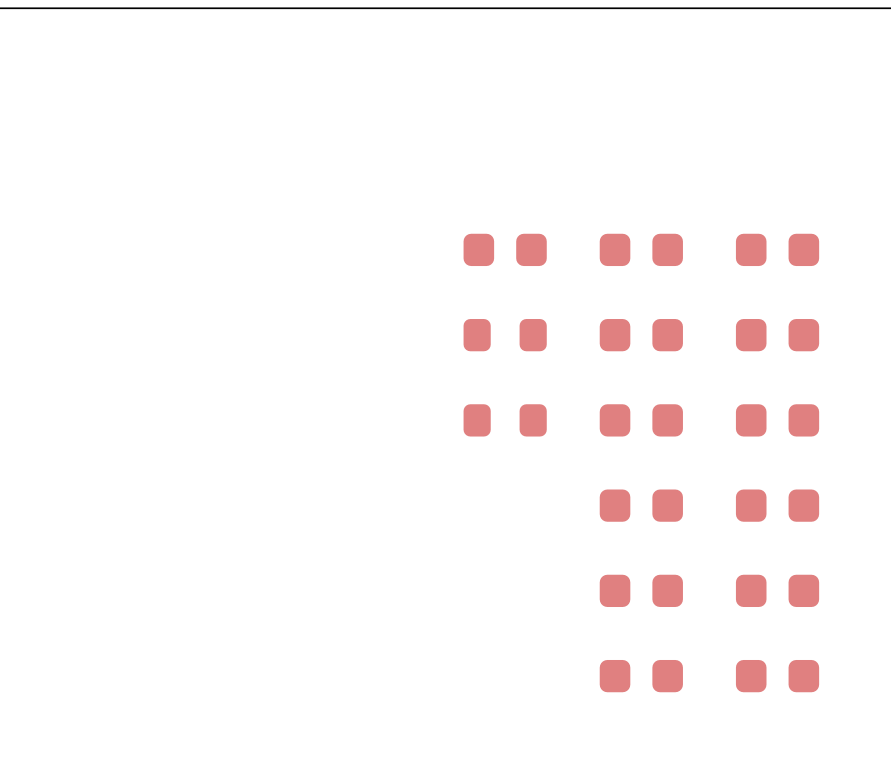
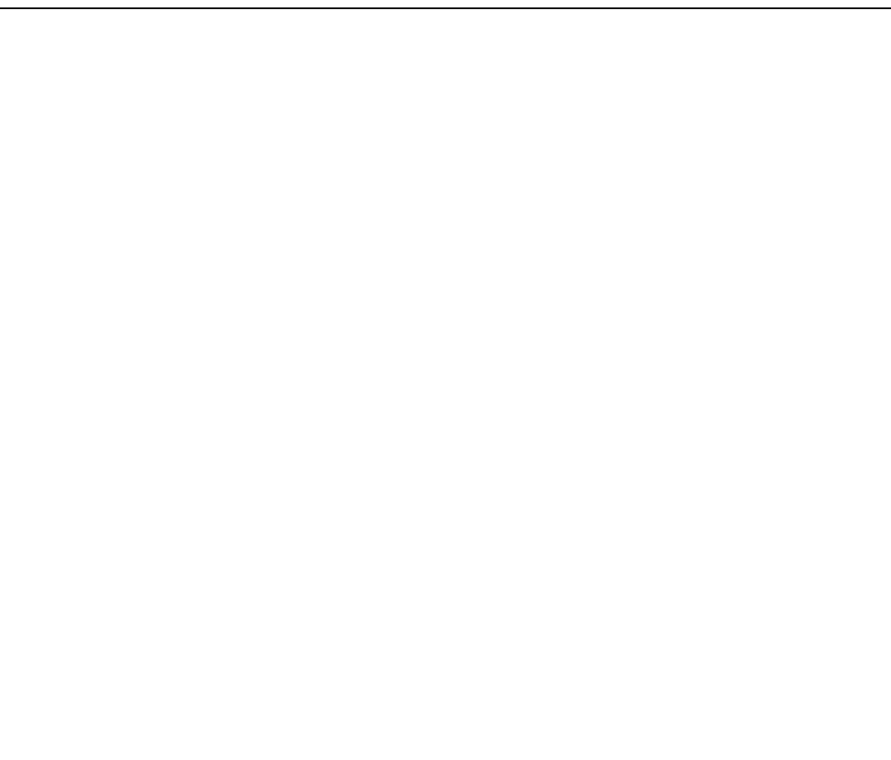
part: (505, 249) -> none
part: (641, 249) -> none
part: (777, 249) -> none
part: (505, 335) -> none
part: (641, 335) -> none
part: (777, 335) -> none
part: (505, 420) -> none
part: (641, 420) -> none
part: (777, 420) -> none
part: (641, 505) -> none
part: (777, 505) -> none
part: (641, 590) -> none
part: (777, 590) -> none
part: (641, 676) -> none
part: (777, 676) -> none

